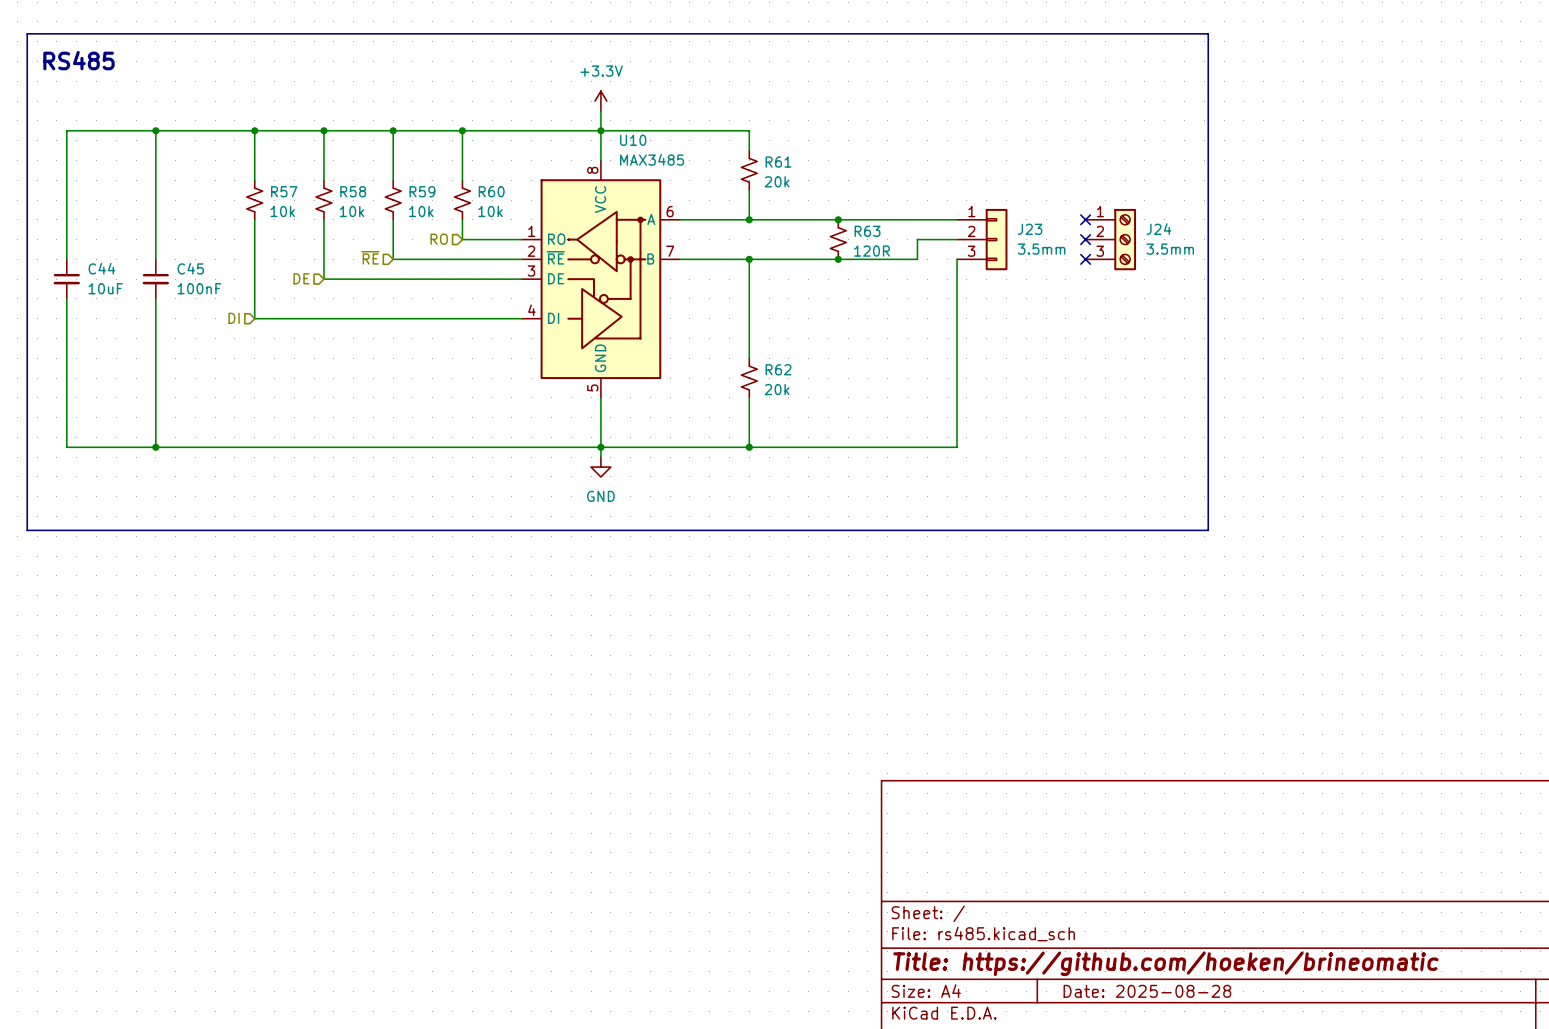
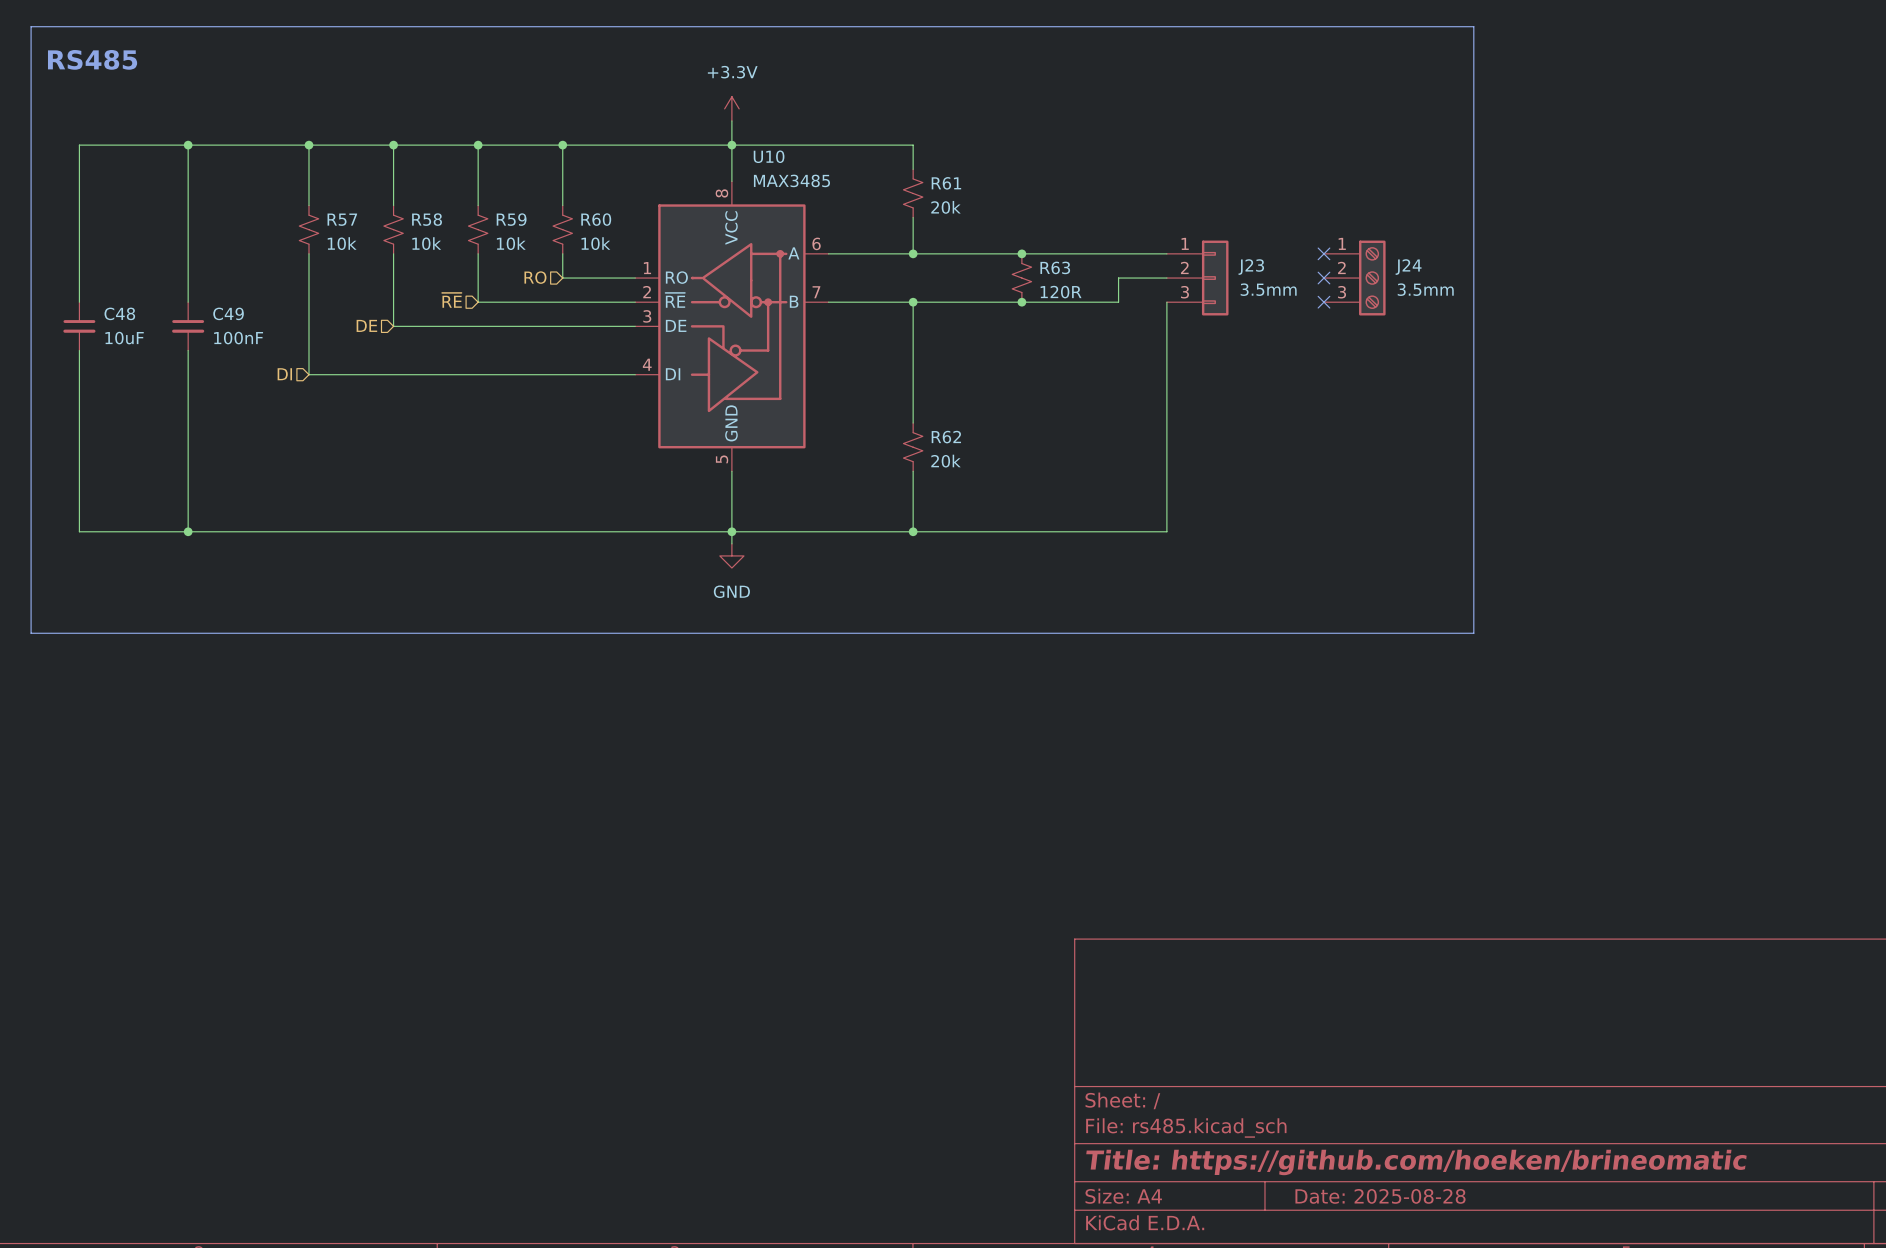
C44 name: C44 (101, 268) -> C48 (119, 313)
C45 name: C45 (190, 268) -> C49 (228, 313)

